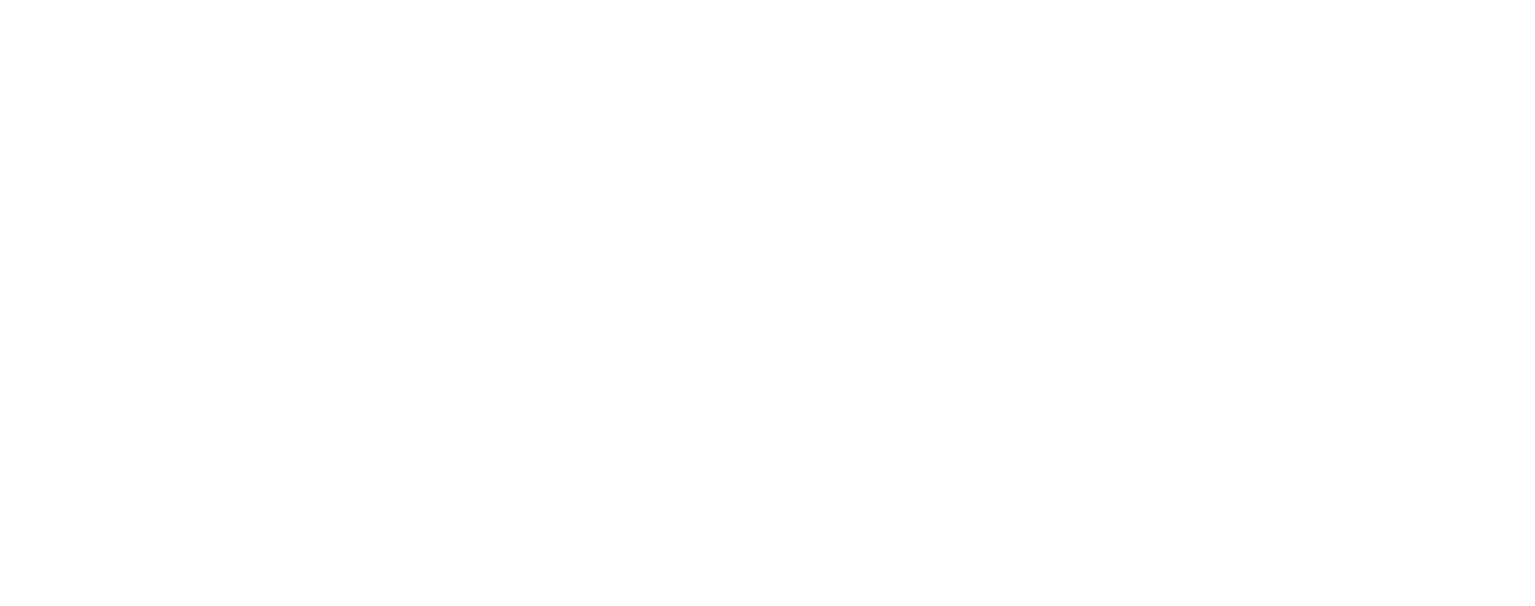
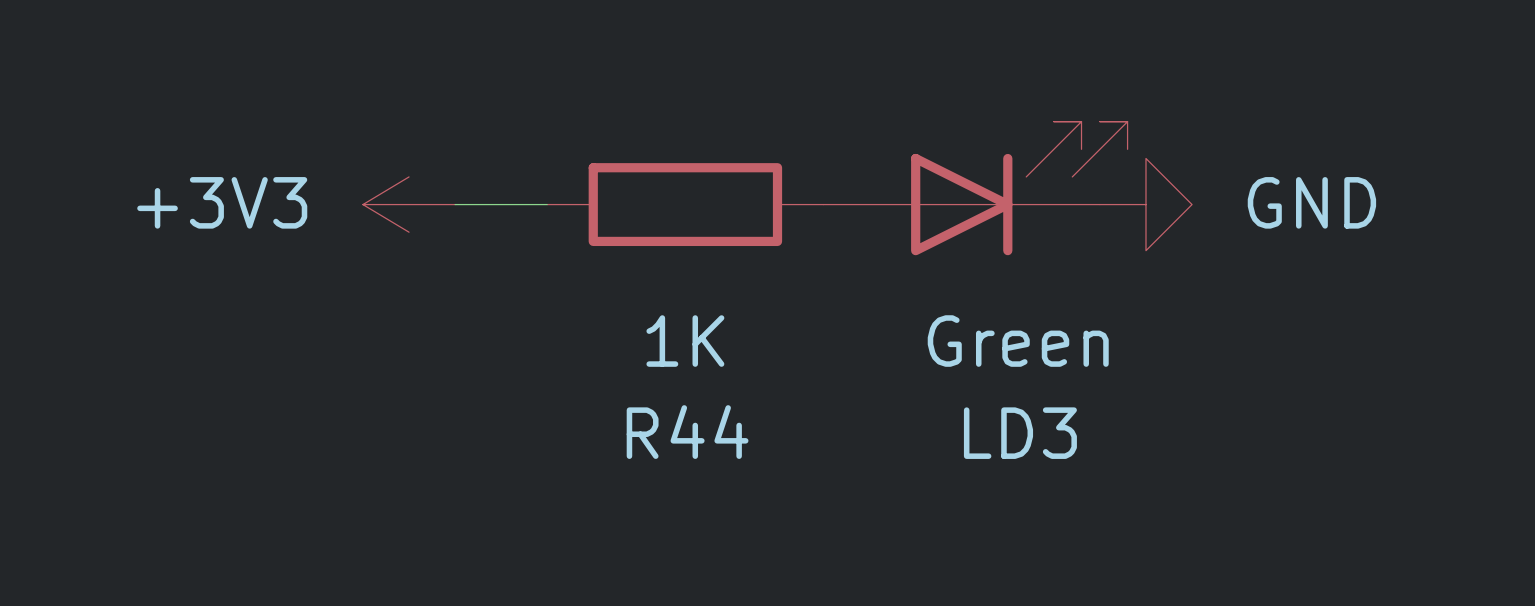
LD3: none -> Green (975, 188)
power symbol: none -> +3V3 (409, 204)
wire: none -> (455, 204) (547, 204)
R44: none -> 1K (685, 204)
power symbol: none -> GND (1145, 204)

